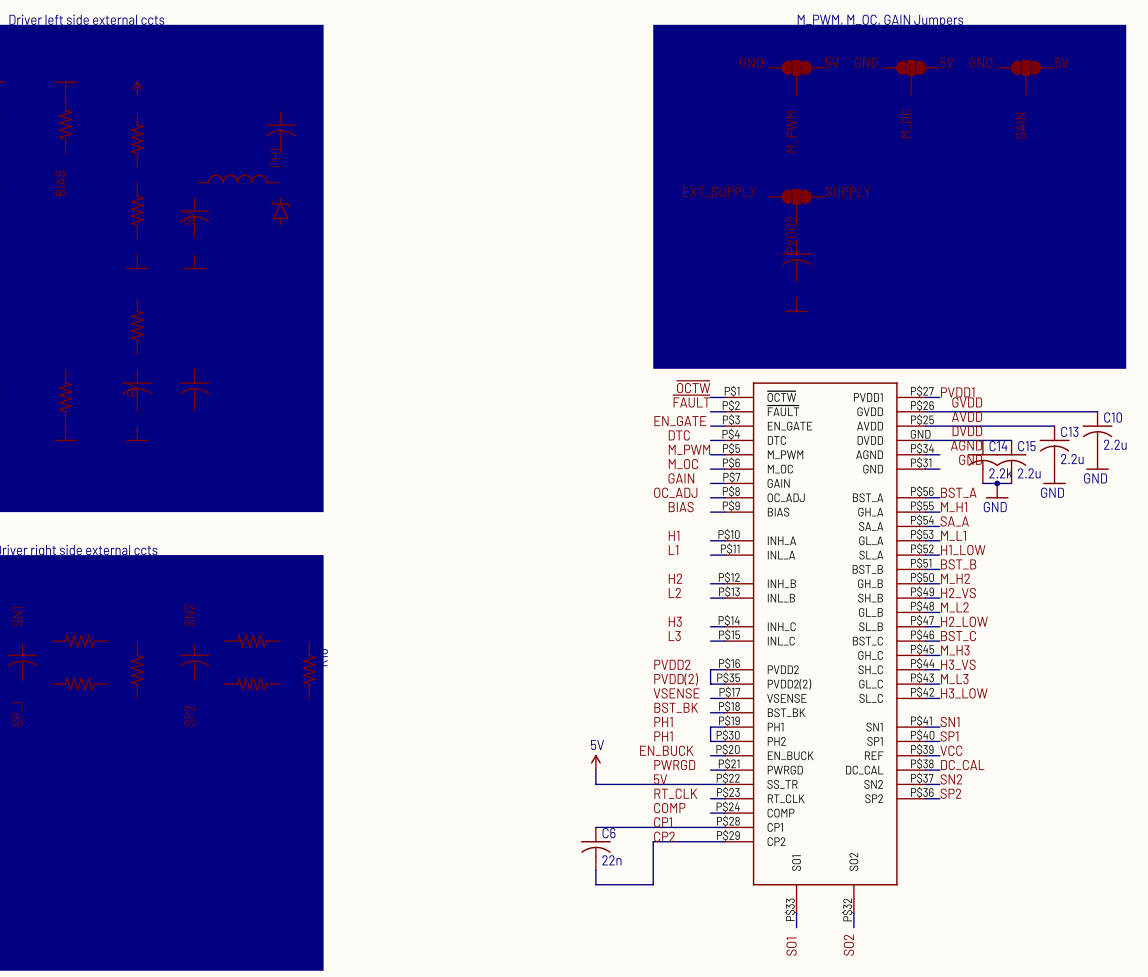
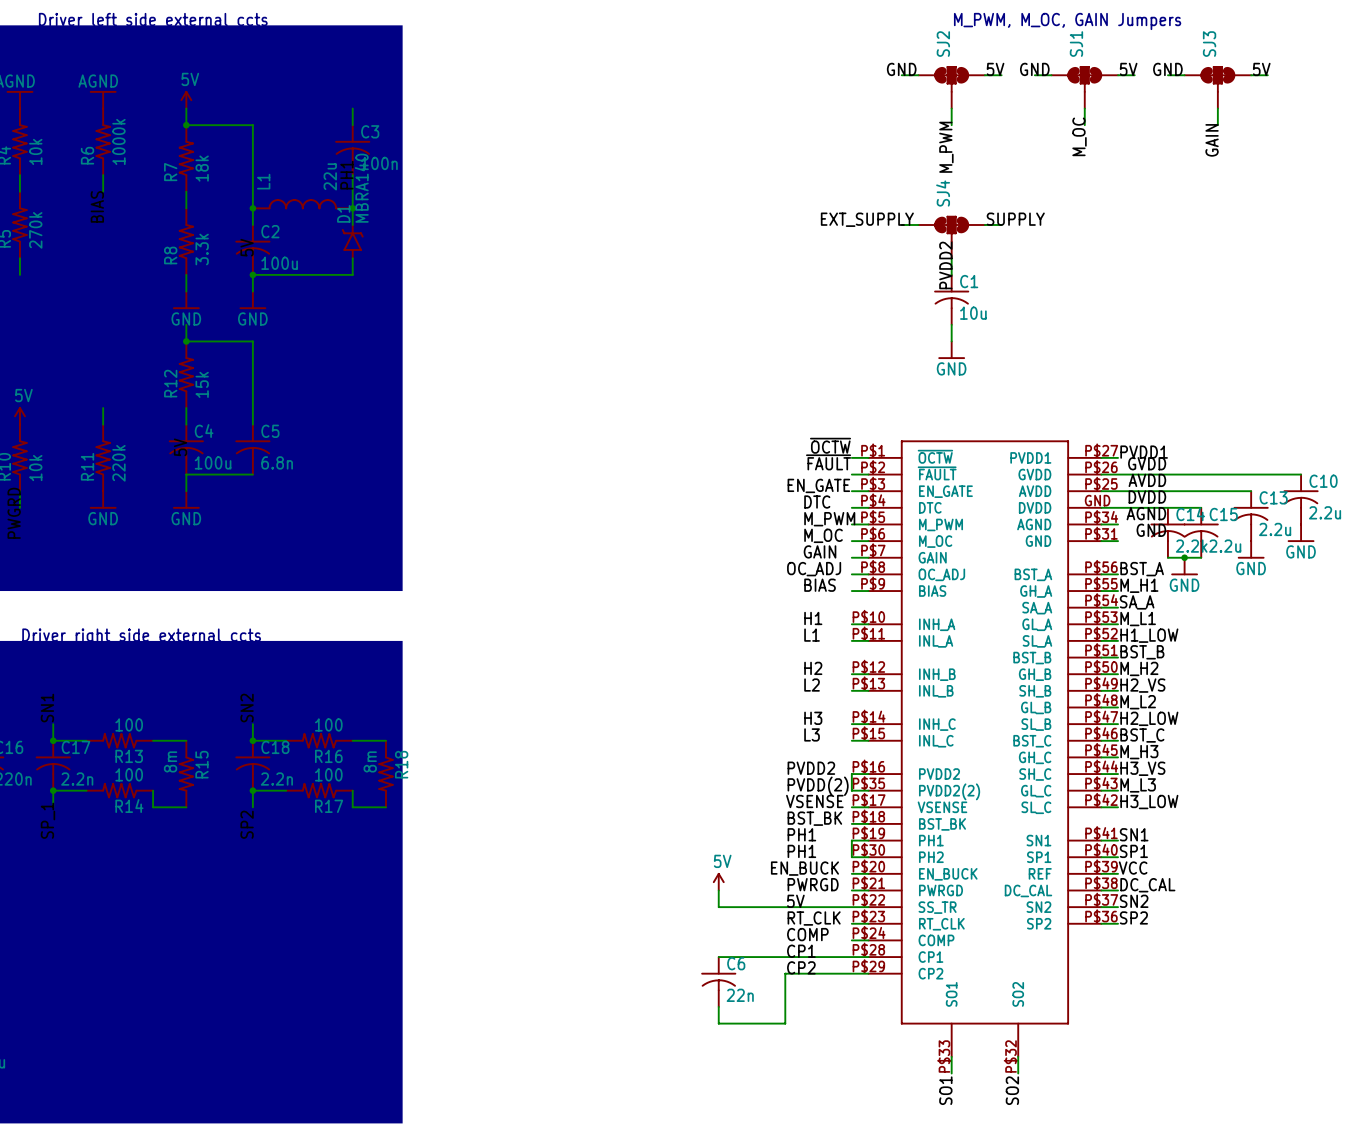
drawing: [653, 24, 1127, 369] -> none

